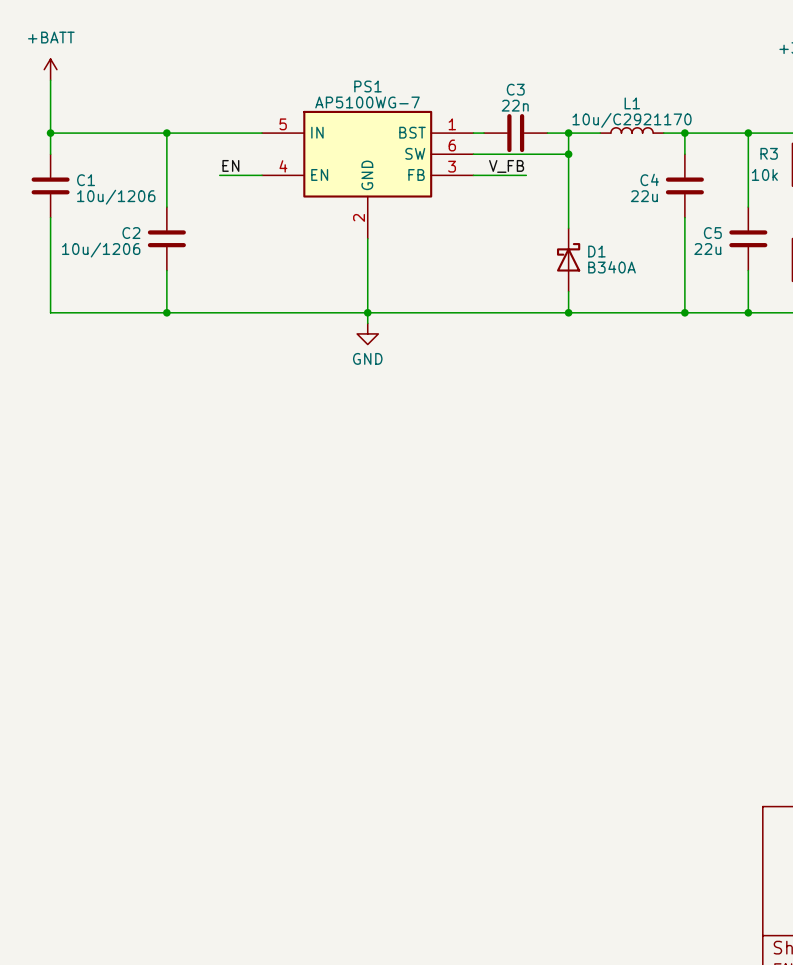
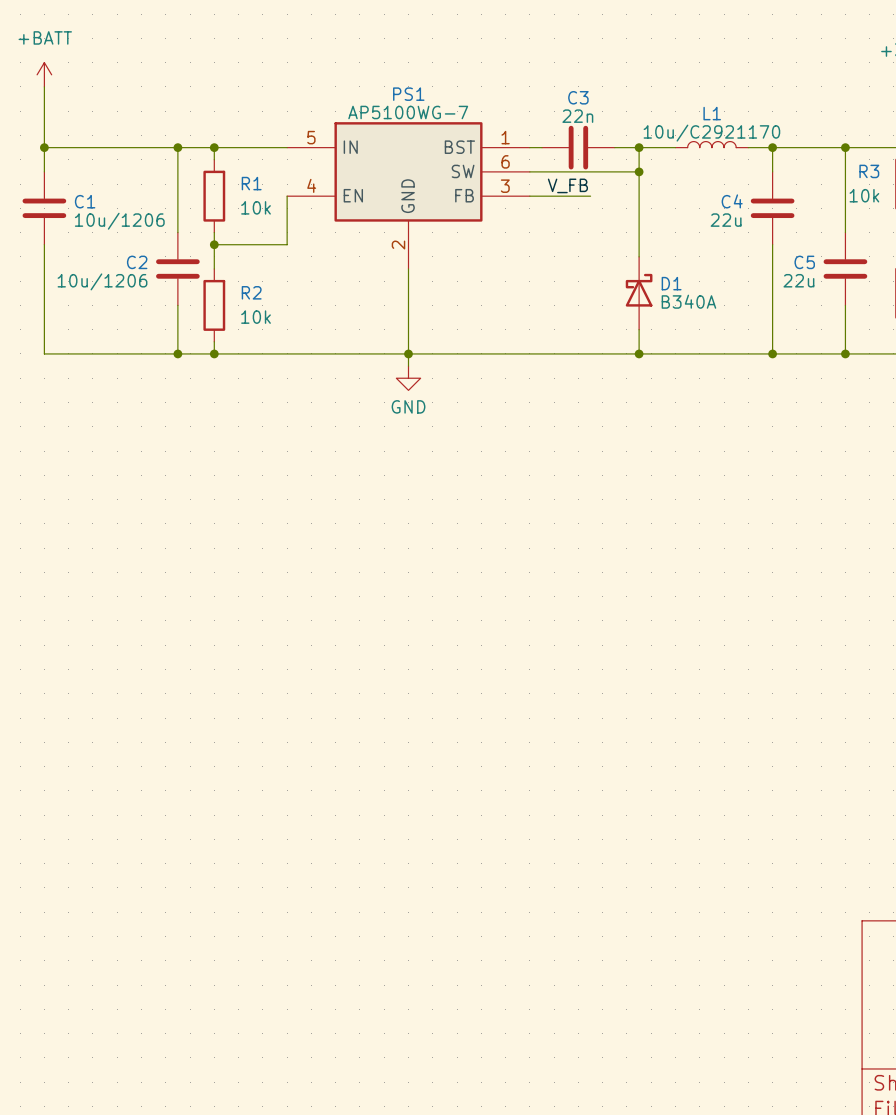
wire: none -> (214, 147) (214, 159)
junction: none -> (214, 147)
label: EN (230, 165) -> none
R1: none -> 10k (214, 196)
wire: (219, 175) (262, 175) -> (214, 244) (287, 244) (287, 196)
wire: none -> (214, 232) (214, 269)
junction: none -> (214, 244)
R2: none -> 10k (214, 305)
wire: none -> (214, 341) (214, 353)
junction: none -> (214, 353)

